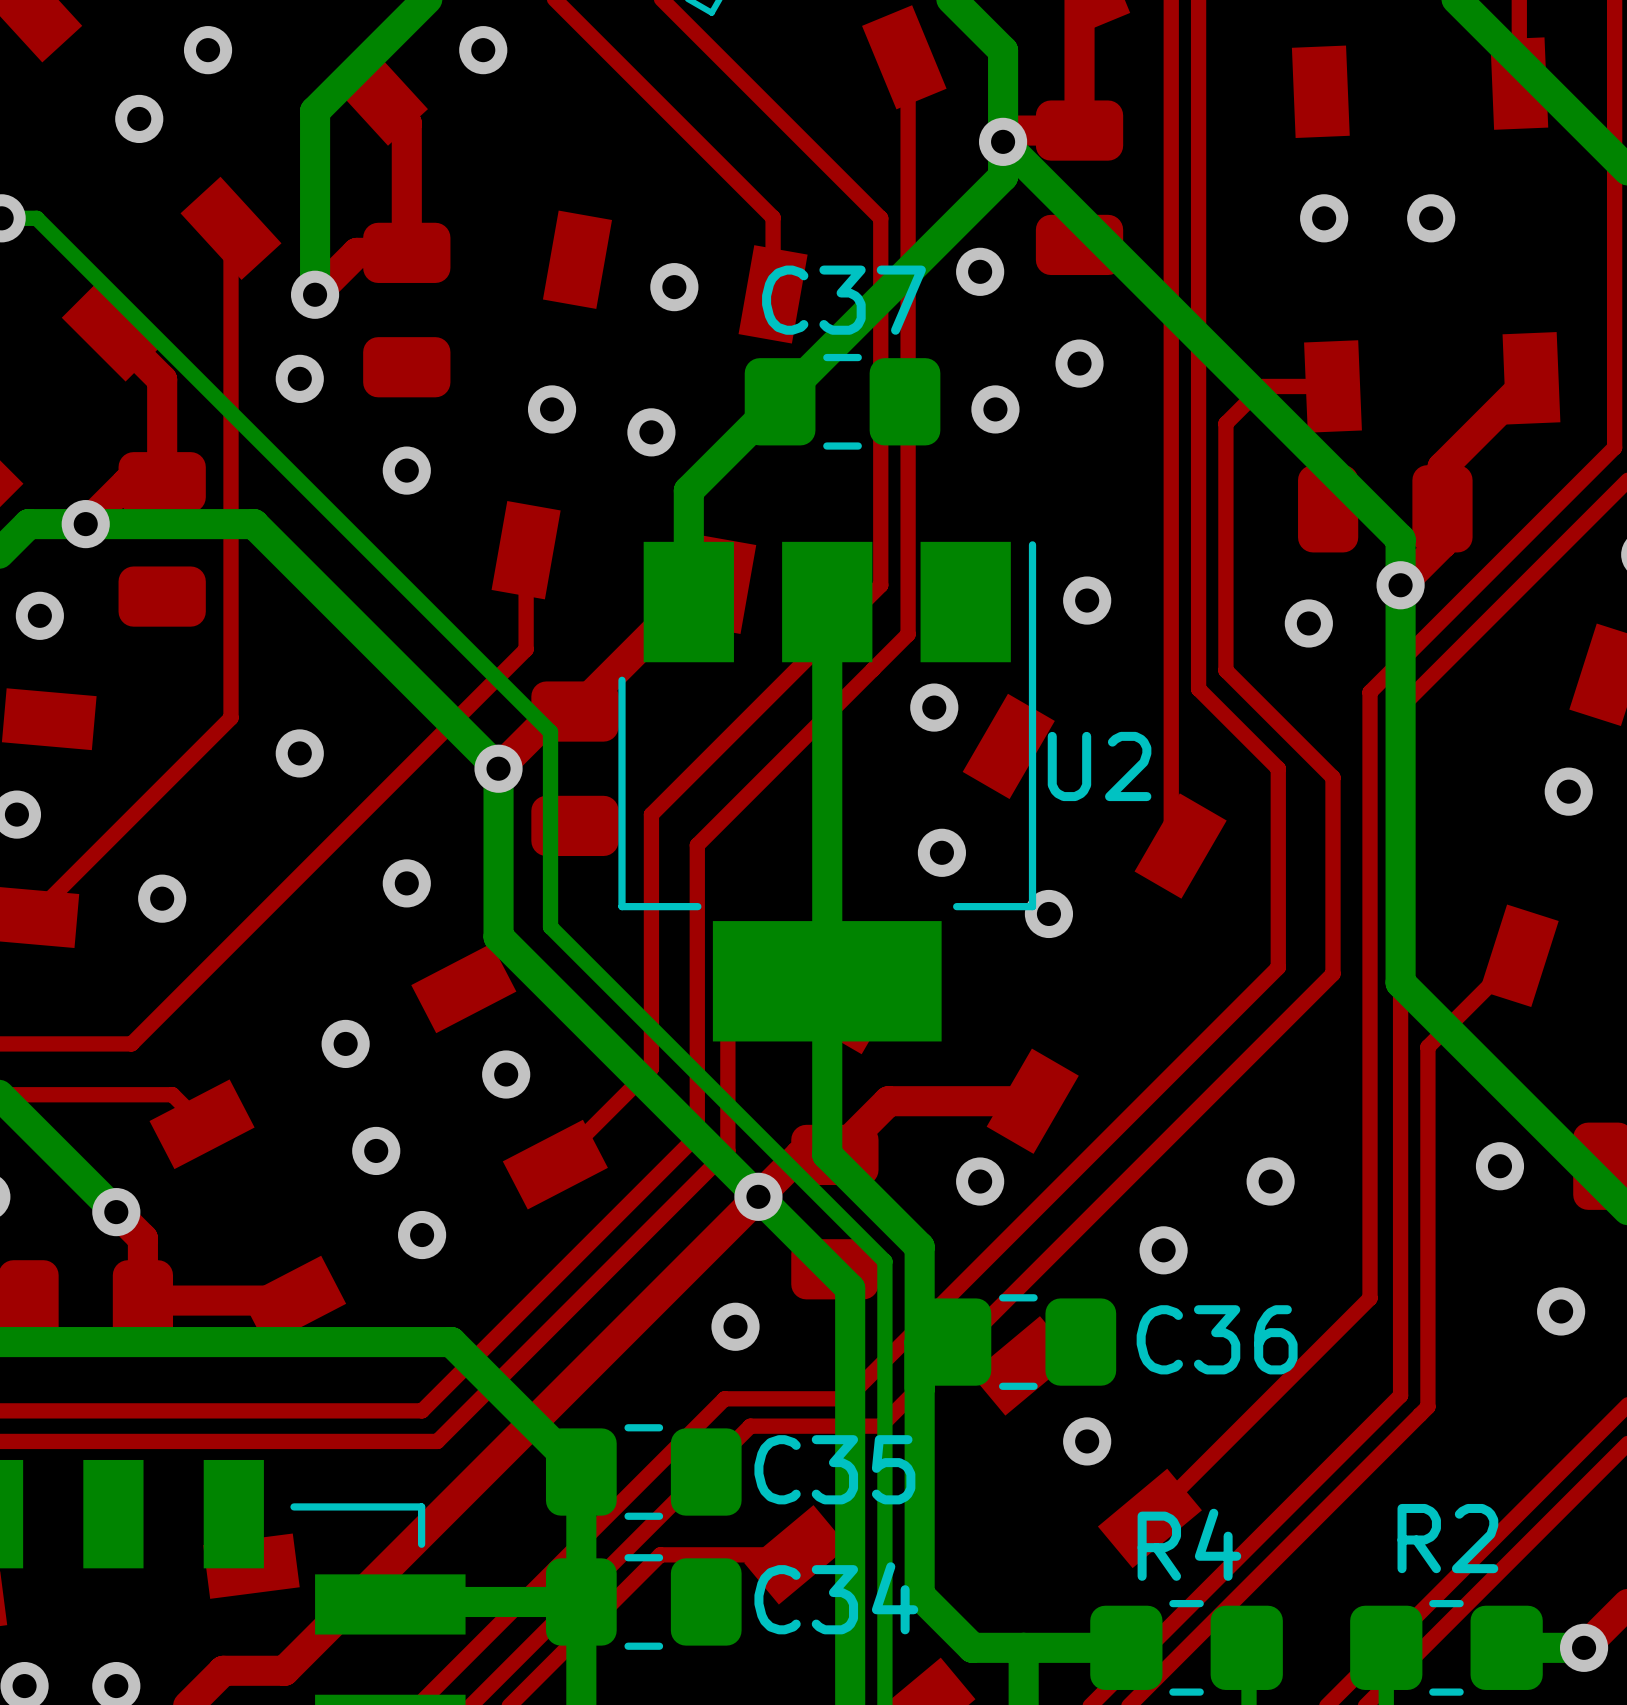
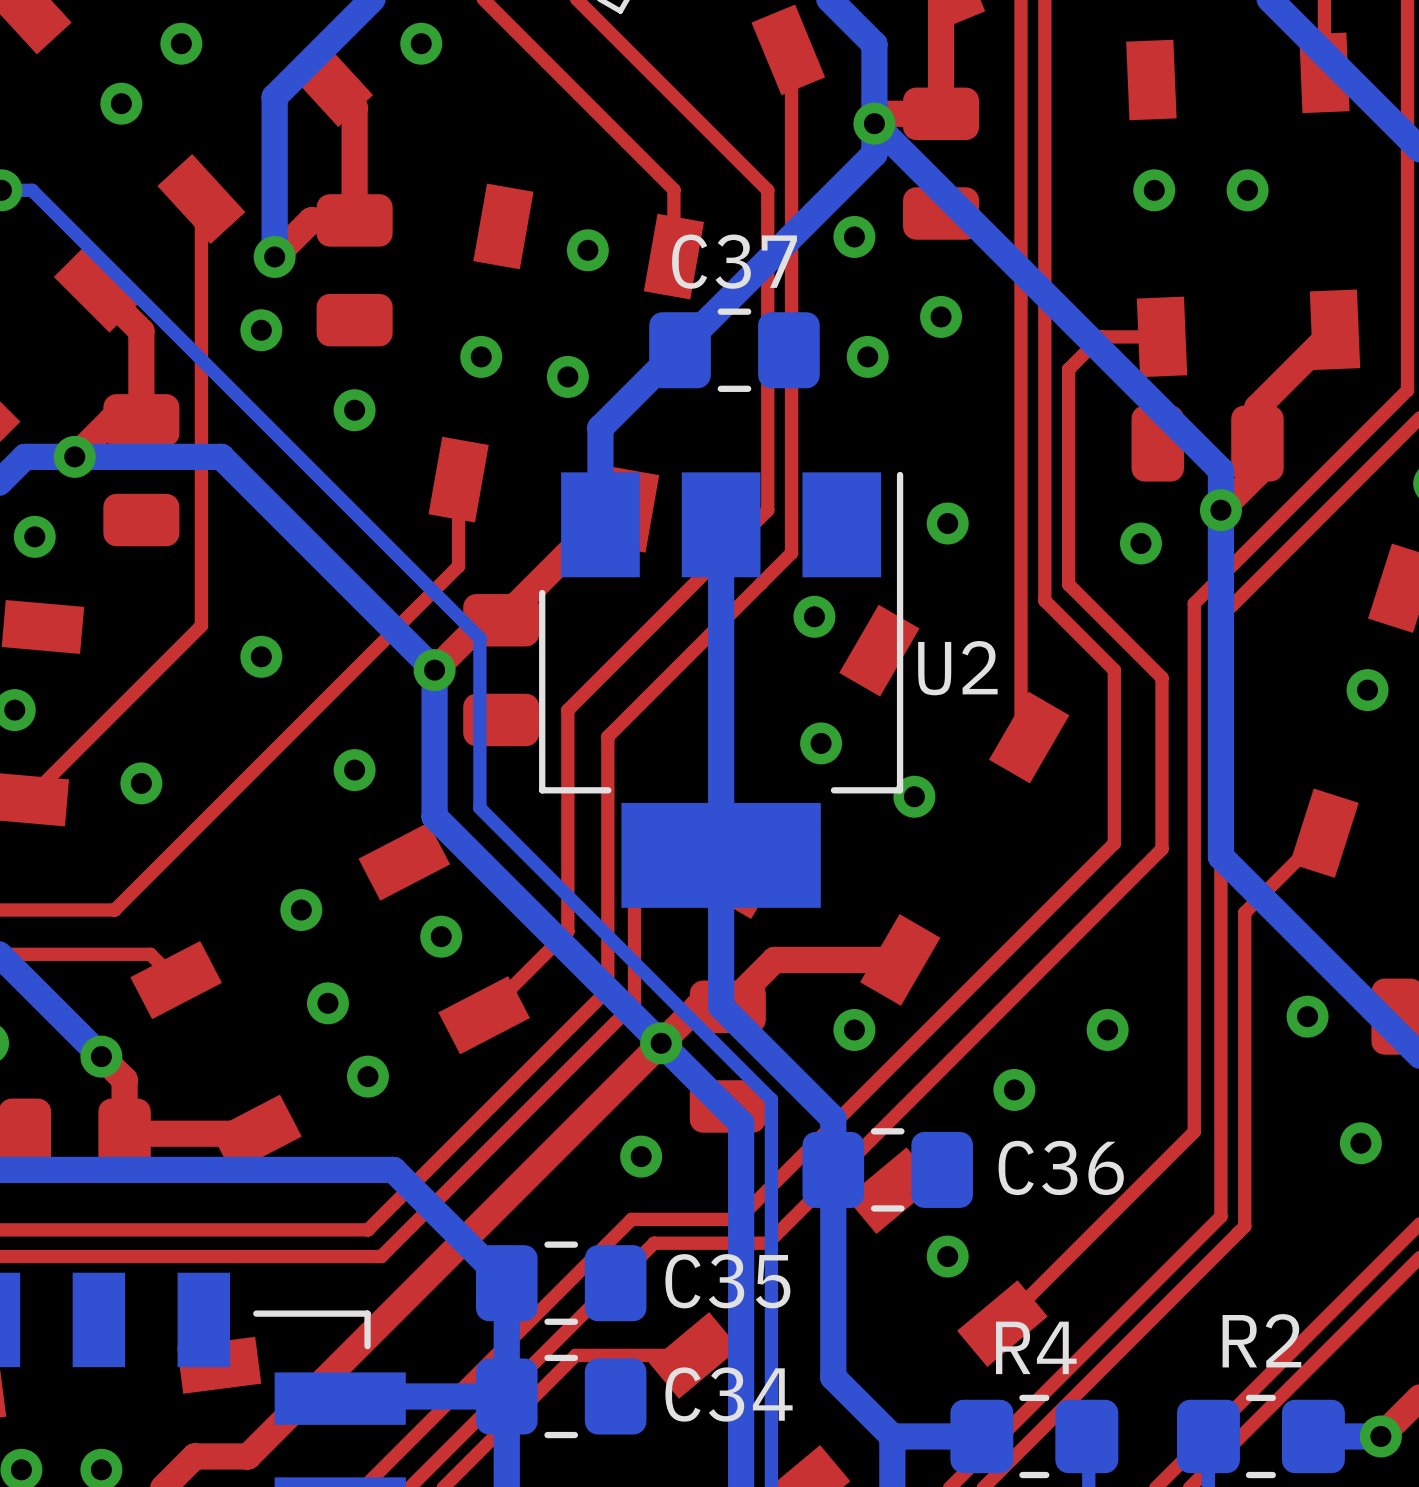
bottom track: (919, 1247) (919, 1594) (972, 1647) (1023, 1647) -> (801, 1087) (833, 1118) (833, 1377) (892, 1436)

